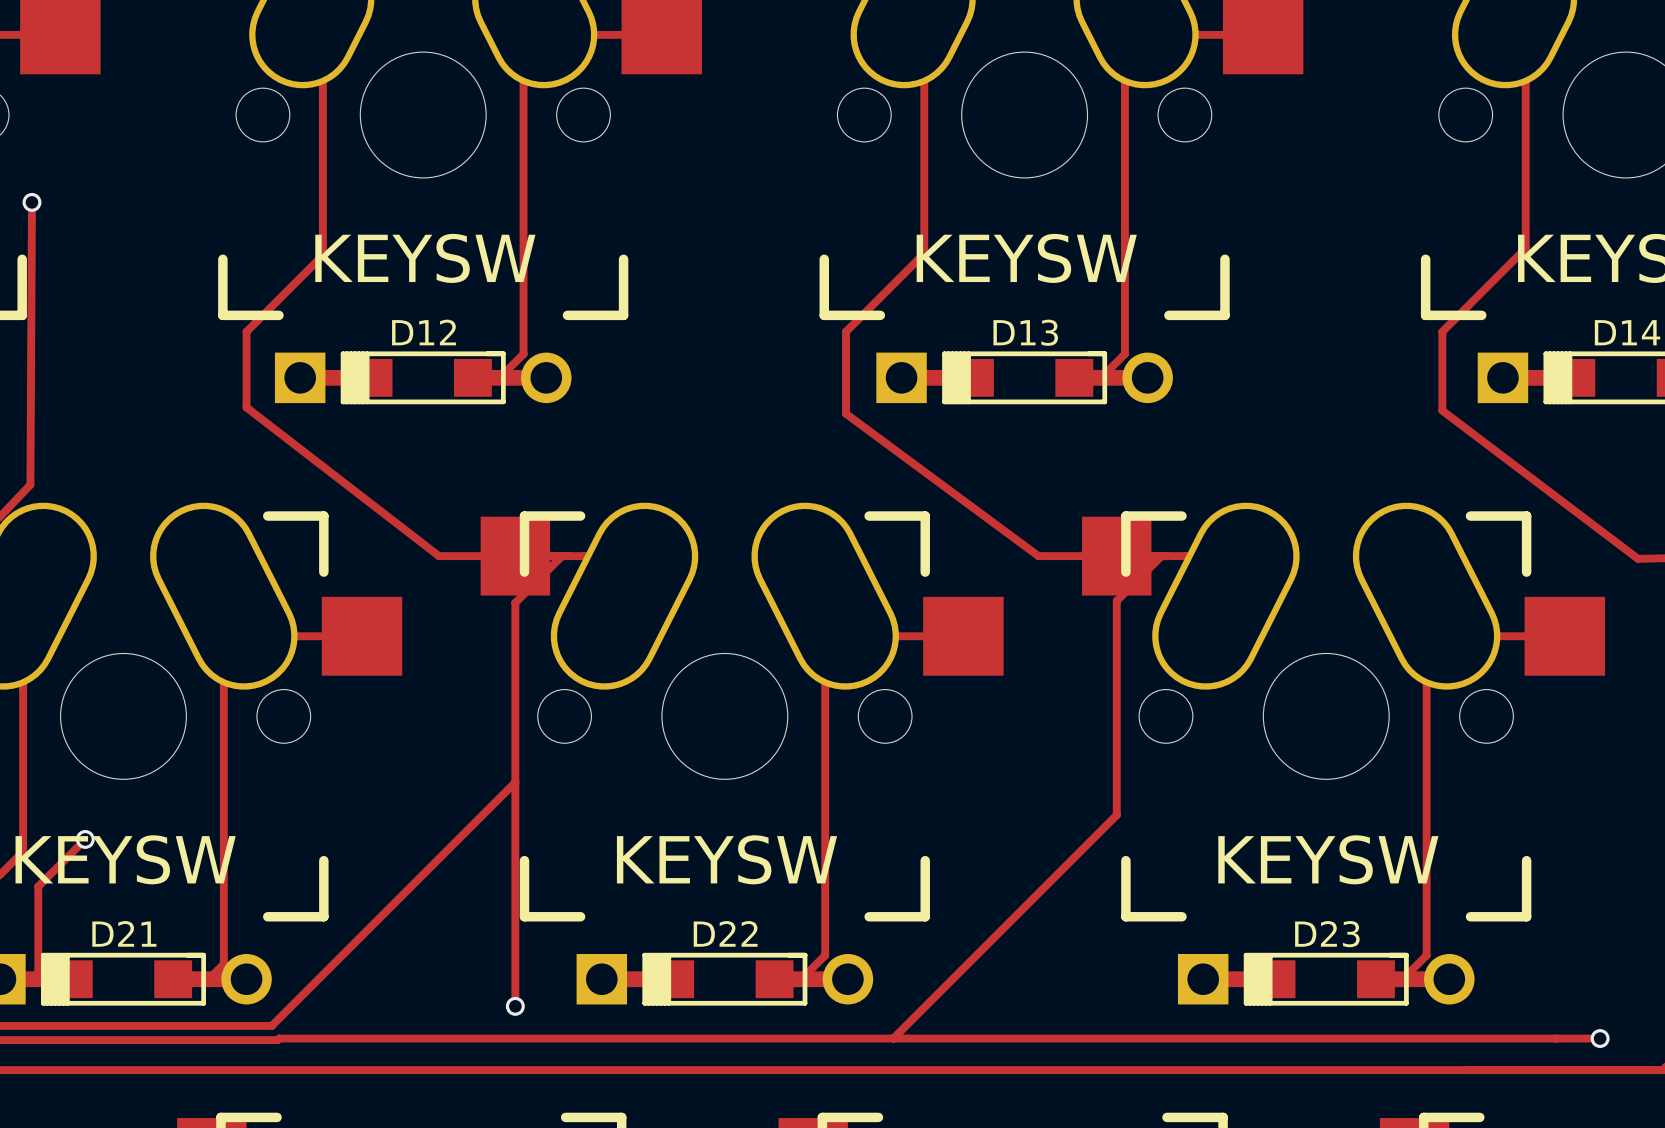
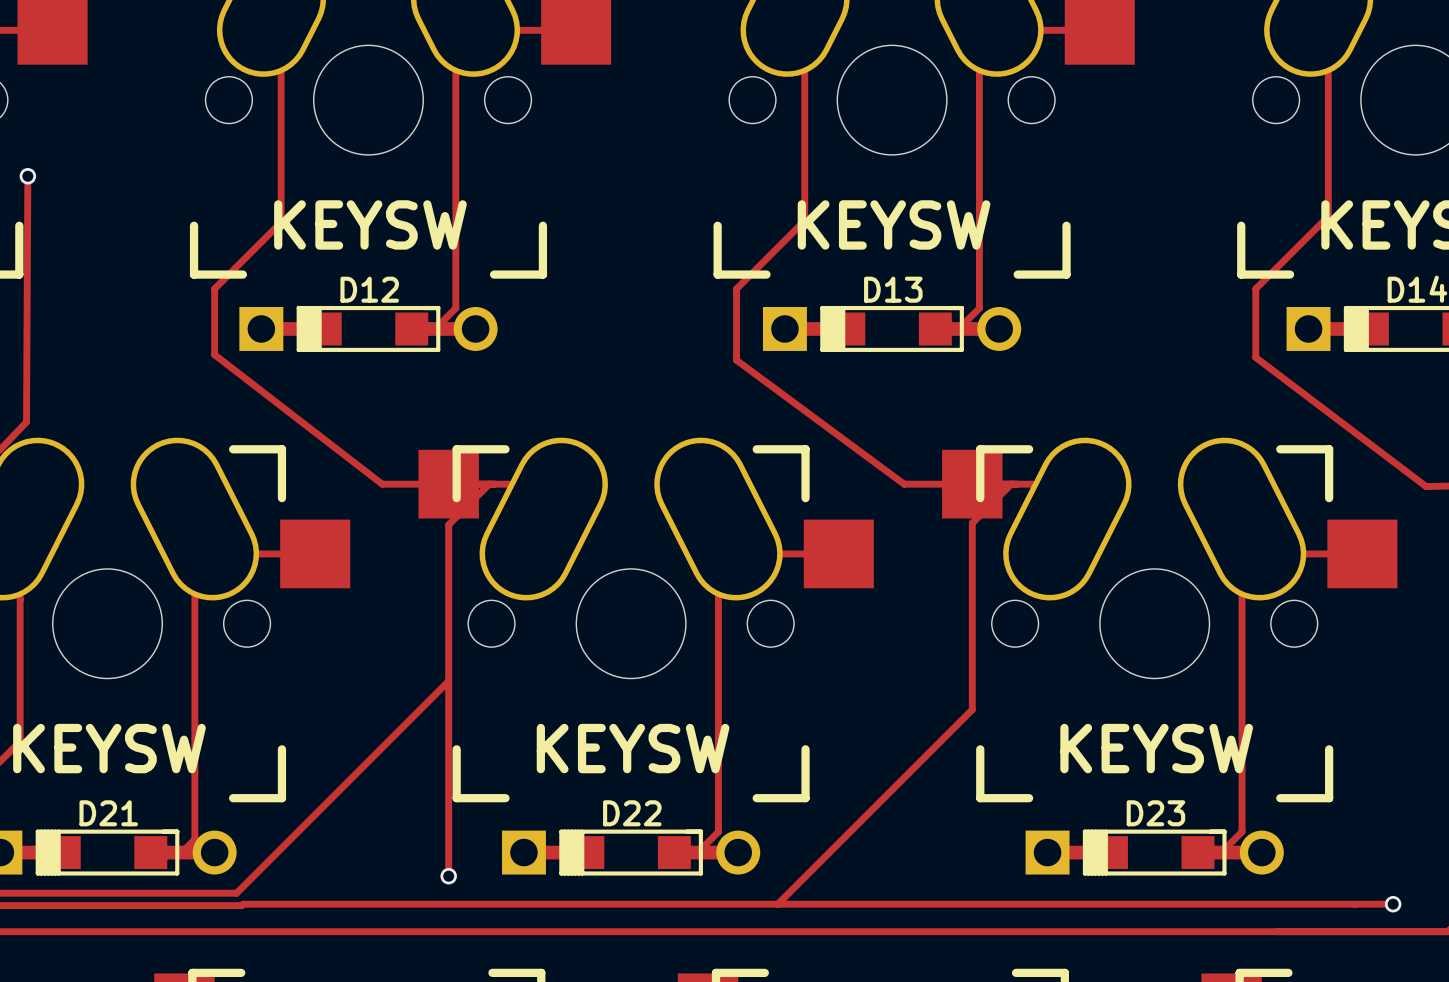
track: (85, 839) (38, 886) (38, 979) -> none
via: (85, 839) -> none

